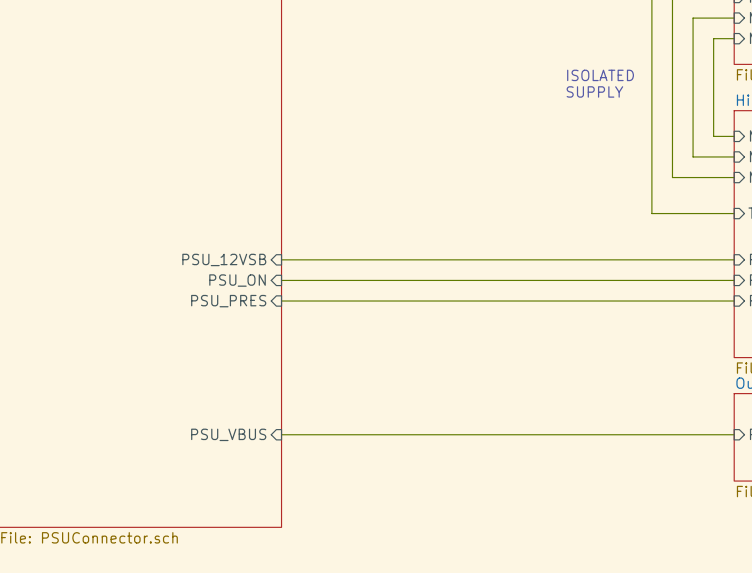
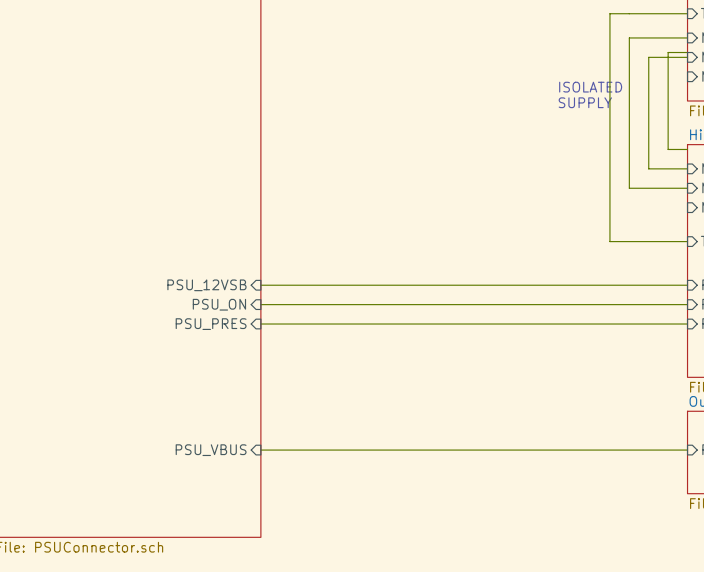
wire: (713, 38) (734, 38) -> (668, 76) (668, 52) (687, 52)
text position: ISOLATED (600, 75) -> ISOLATED (590, 87)
text position: SUPPLY (594, 91) -> SUPPLY (585, 102)
wire: (713, 115) (713, 136) -> (668, 149) (687, 149)
wire: (693, 136) (693, 156) -> (648, 168) (668, 168)
wire: (672, 156) (672, 177) (734, 177) -> (629, 188) (648, 188)

